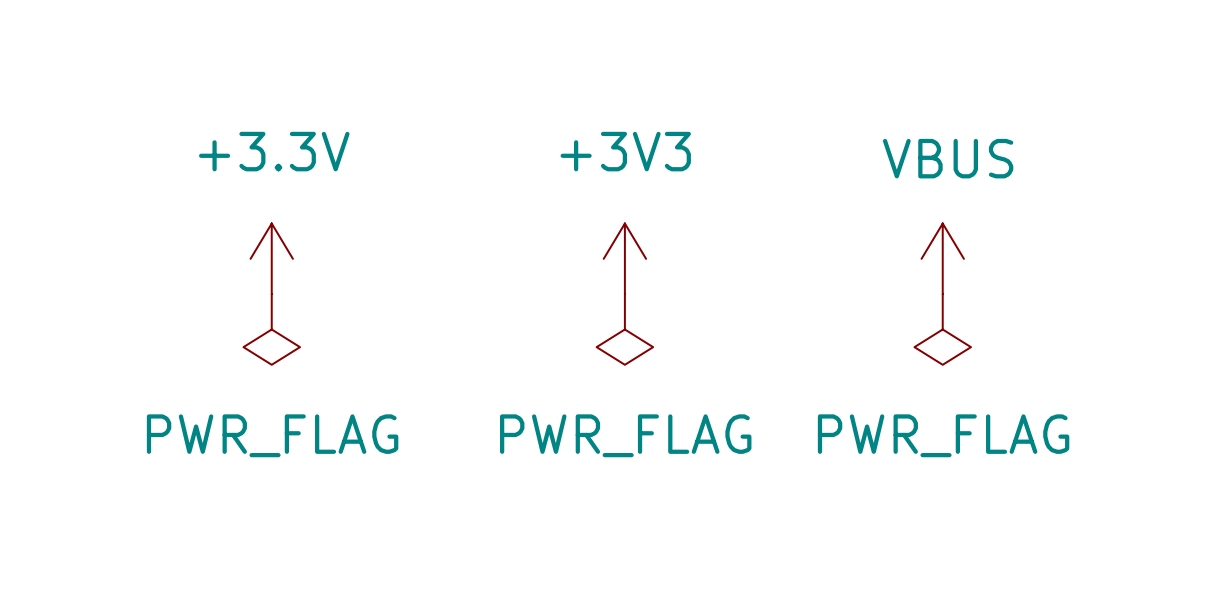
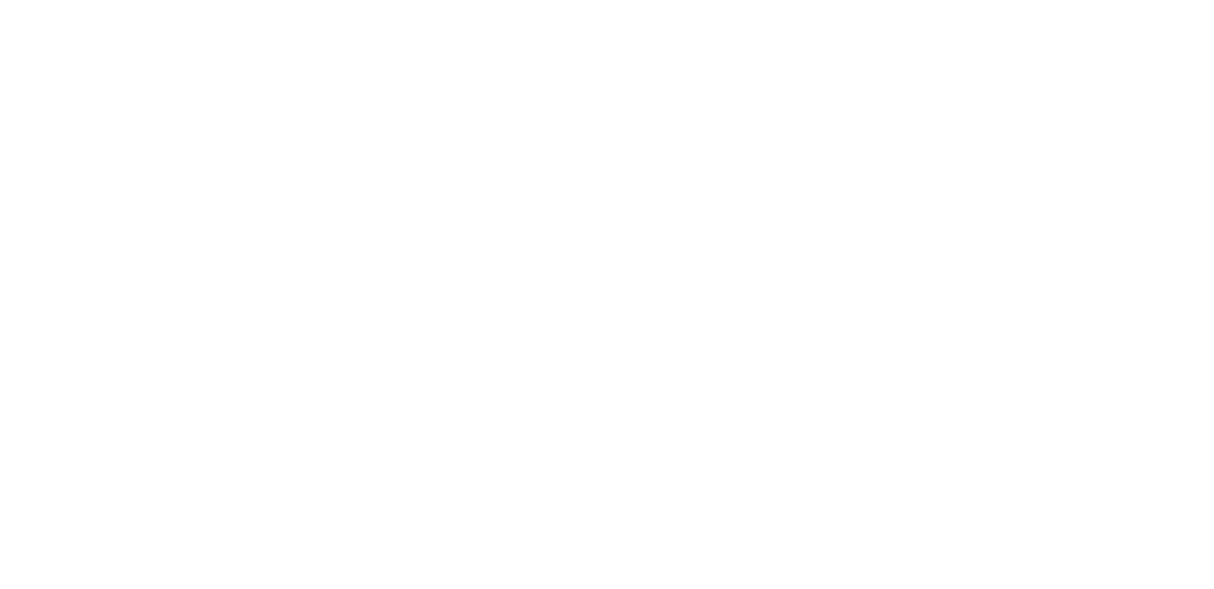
power symbol: +3.3V (271, 258) -> none
power symbol: +3V3 (624, 258) -> none
power symbol: VBUS (942, 258) -> none
power symbol: PWR_FLAG (271, 329) -> none
power symbol: PWR_FLAG (624, 329) -> none
power symbol: PWR_FLAG (942, 329) -> none

